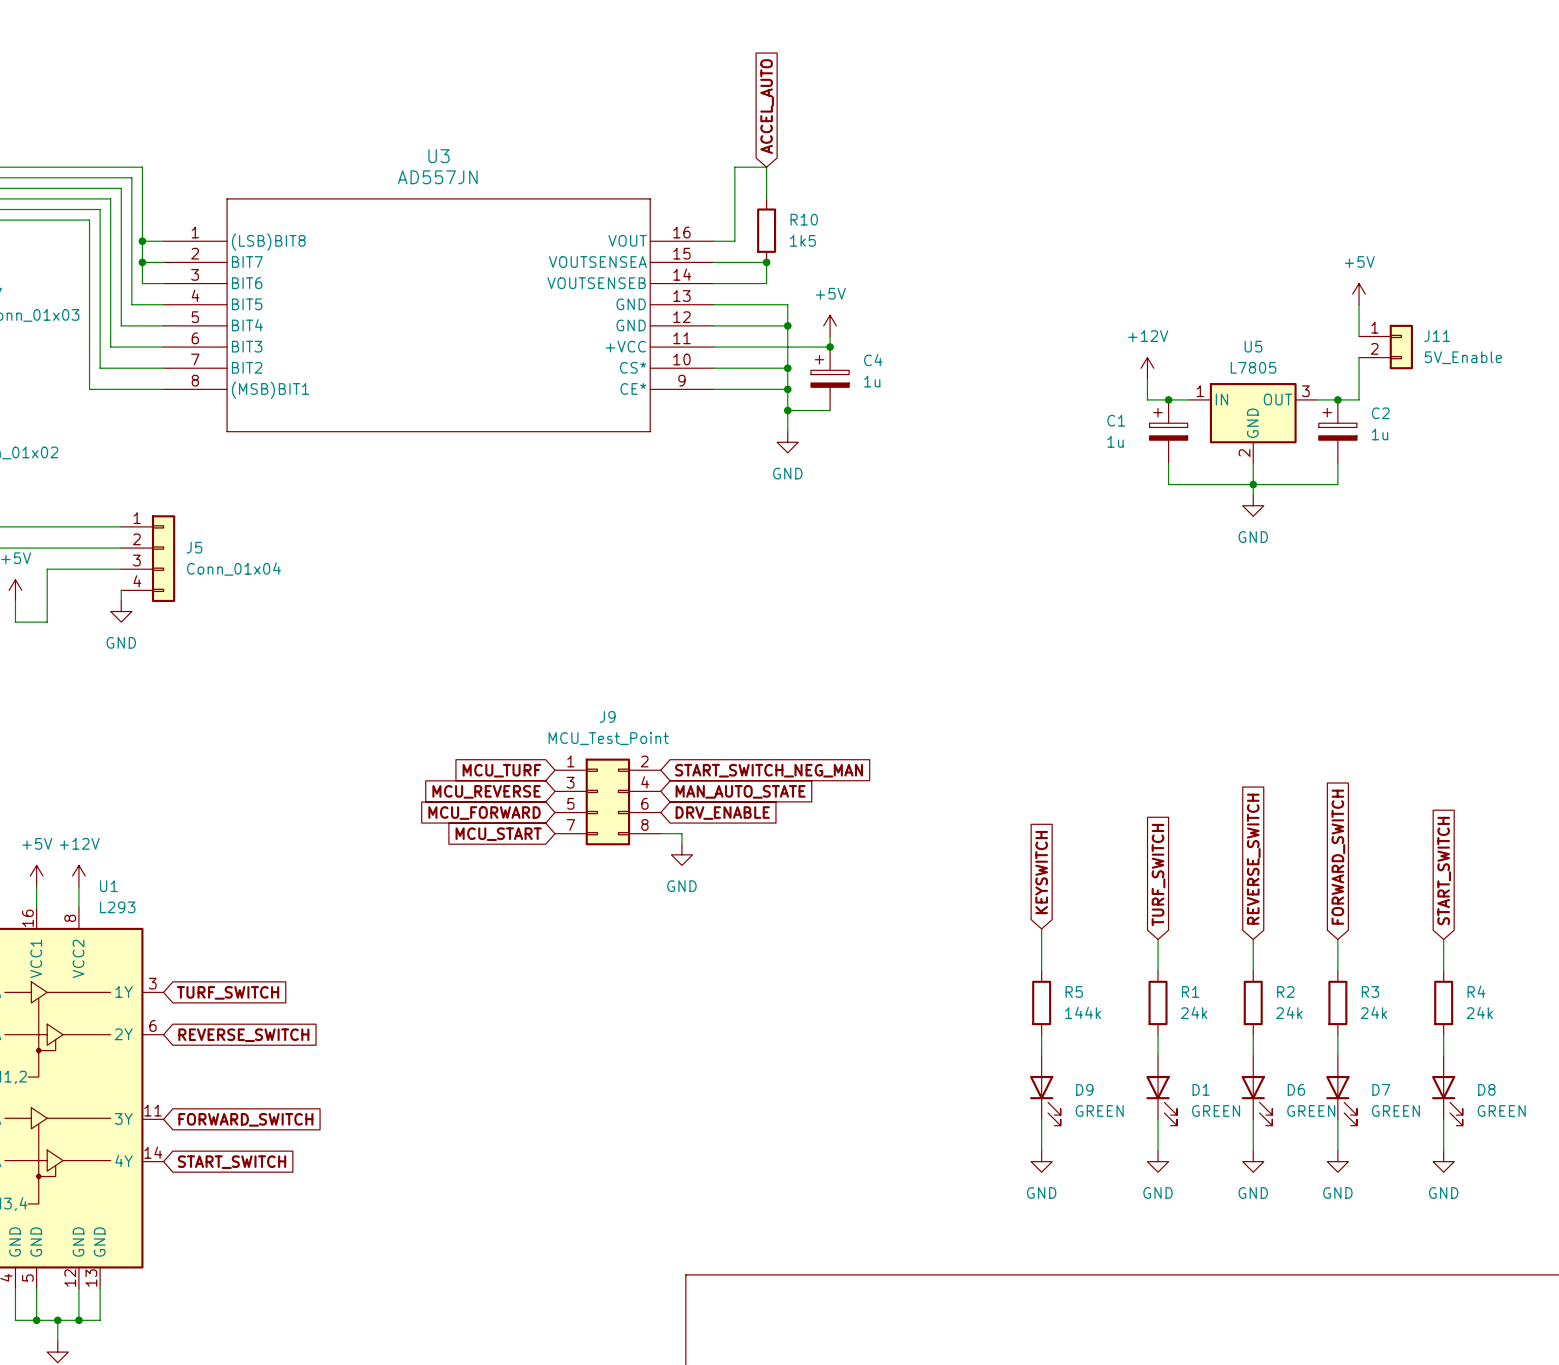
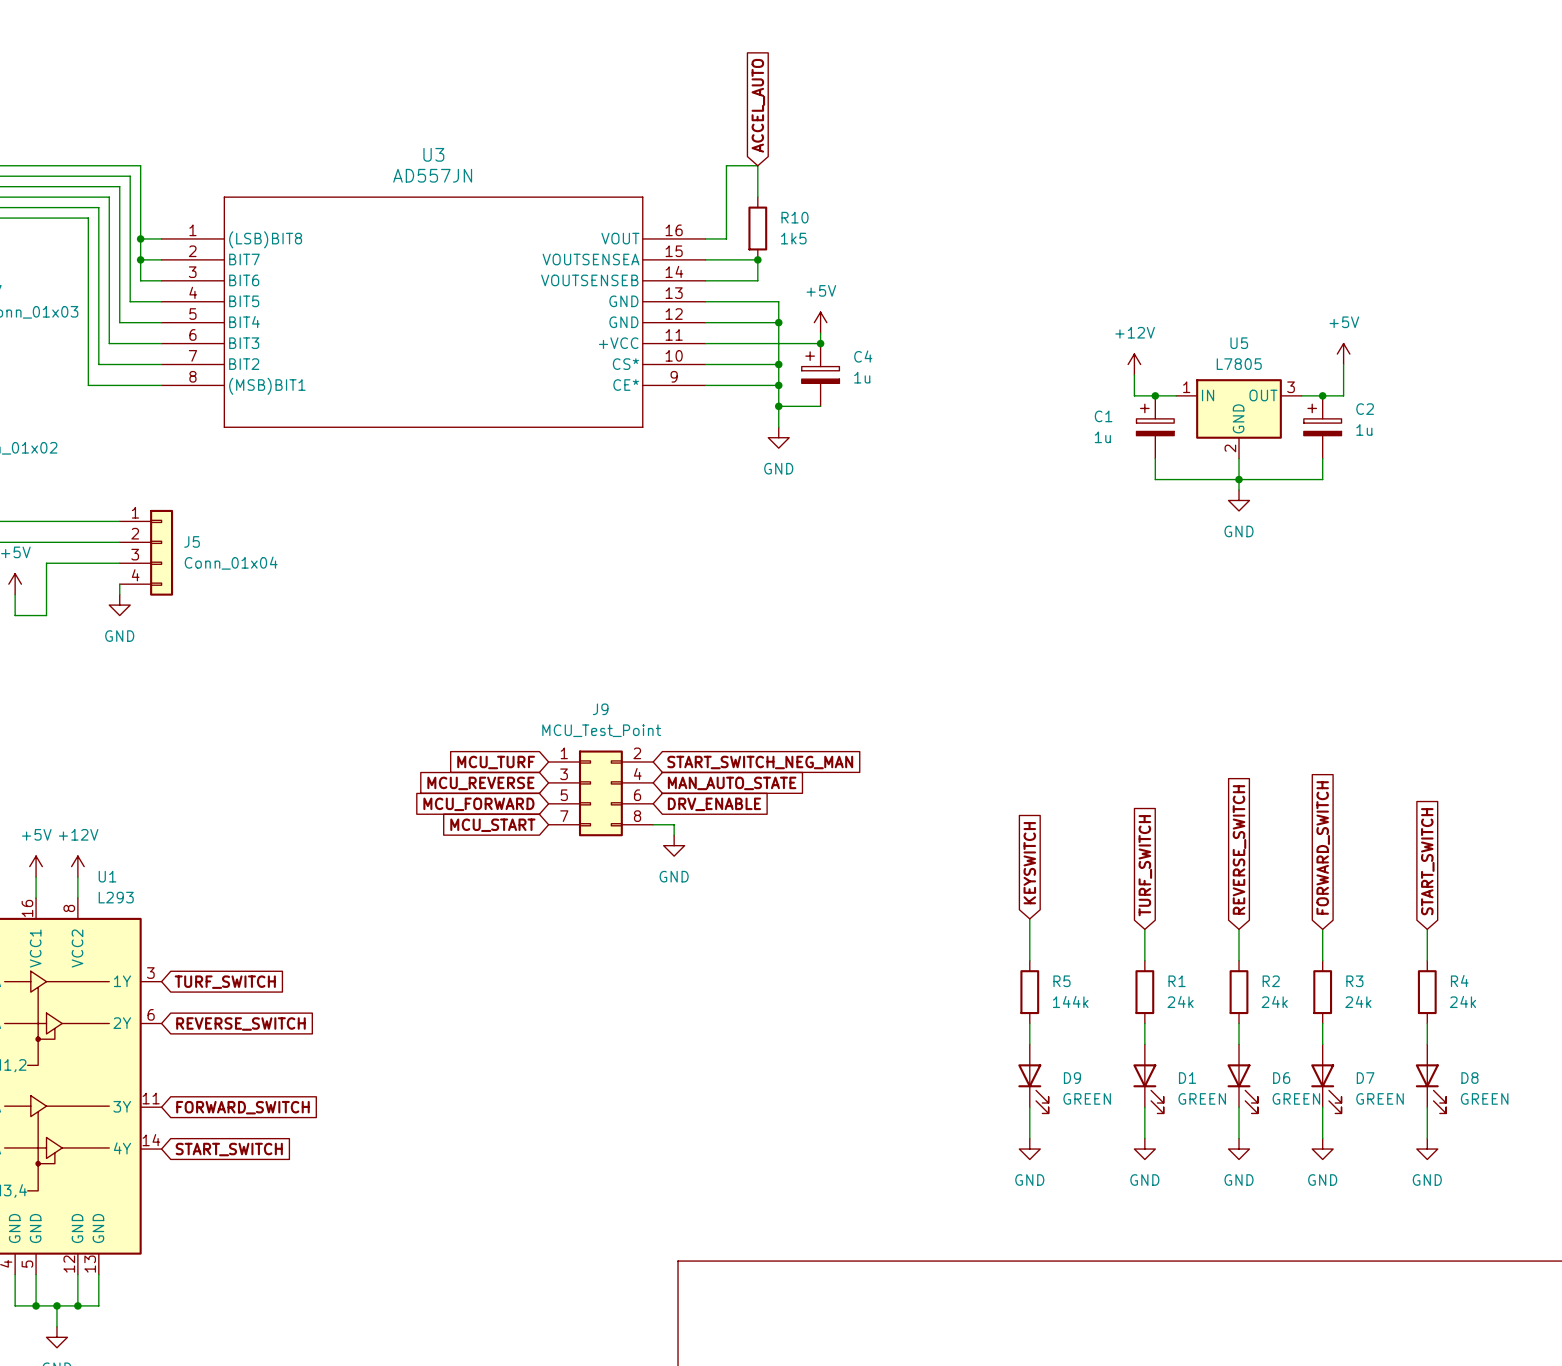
power symbol position: +5V (1359, 294) -> +5V (1343, 354)
wire: (1359, 304) (1359, 336) -> none
J11: 5V_Enable (1386, 347) -> none

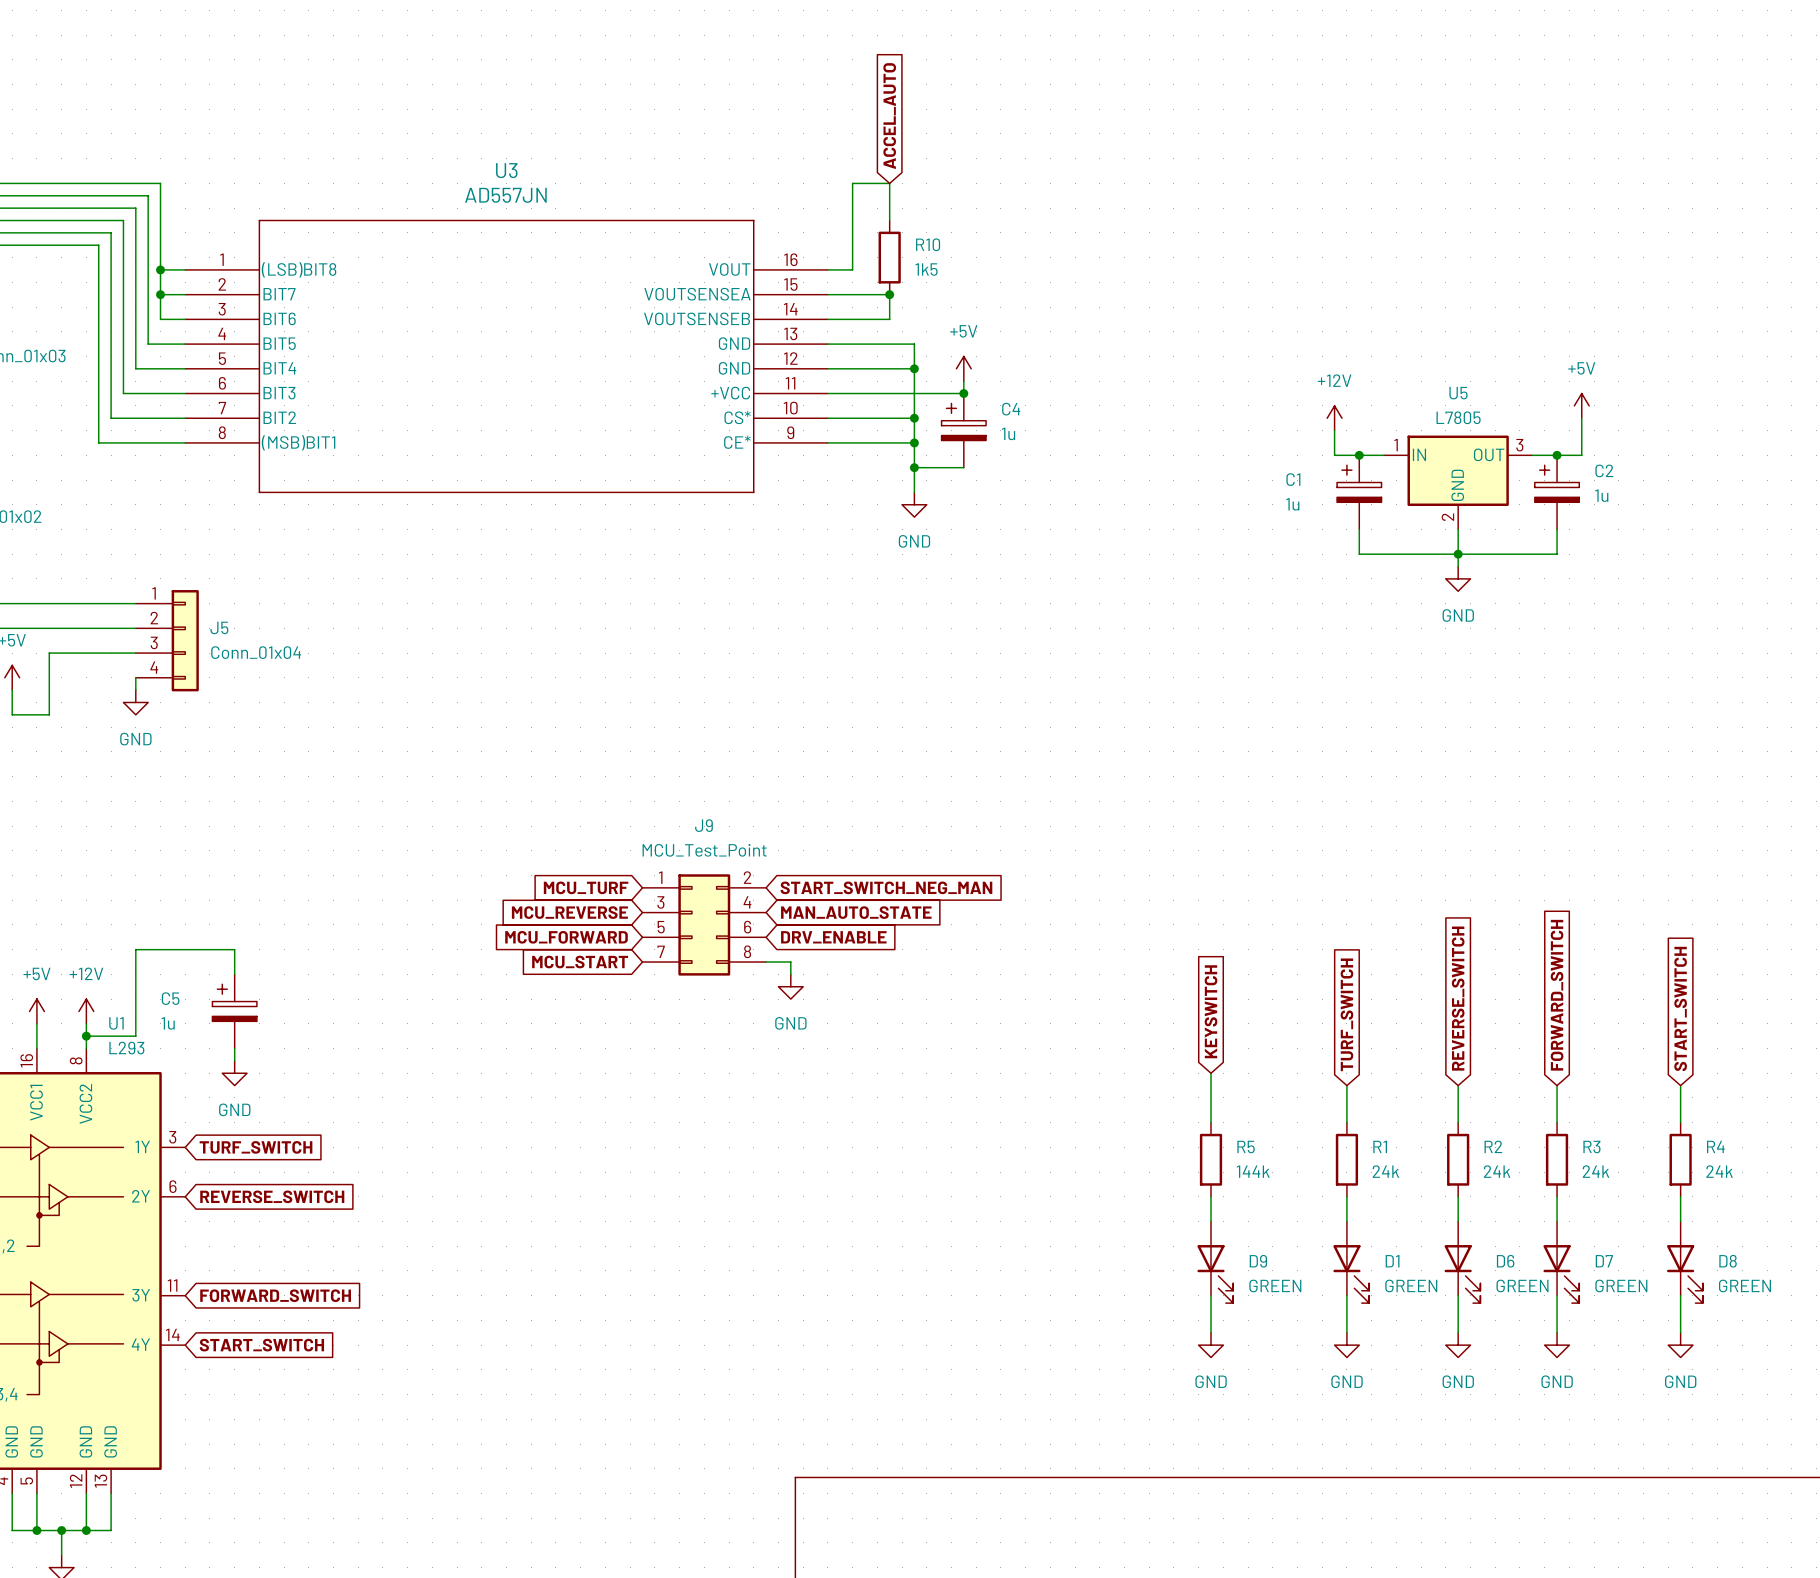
wire: none -> (234, 974) (234, 949) (135, 949) (135, 1036) (86, 1036)
C5: none -> 1u (234, 1011)
junction: none -> (86, 1036)
wire: none -> (234, 1048) (234, 1060)
power symbol: none -> GND (234, 1073)

